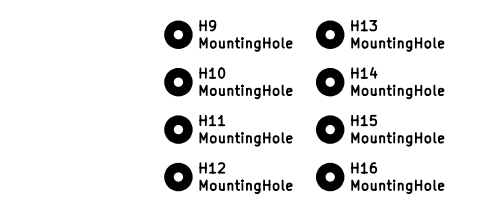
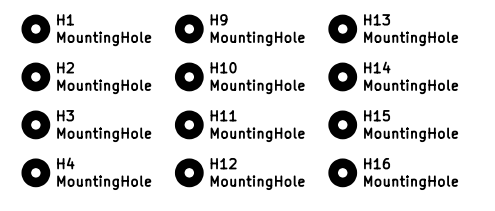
H1: none -> MountingHole (35, 29)
H2: none -> MountingHole (35, 76)
H3: none -> MountingHole (35, 124)
H4: none -> MountingHole (35, 172)

